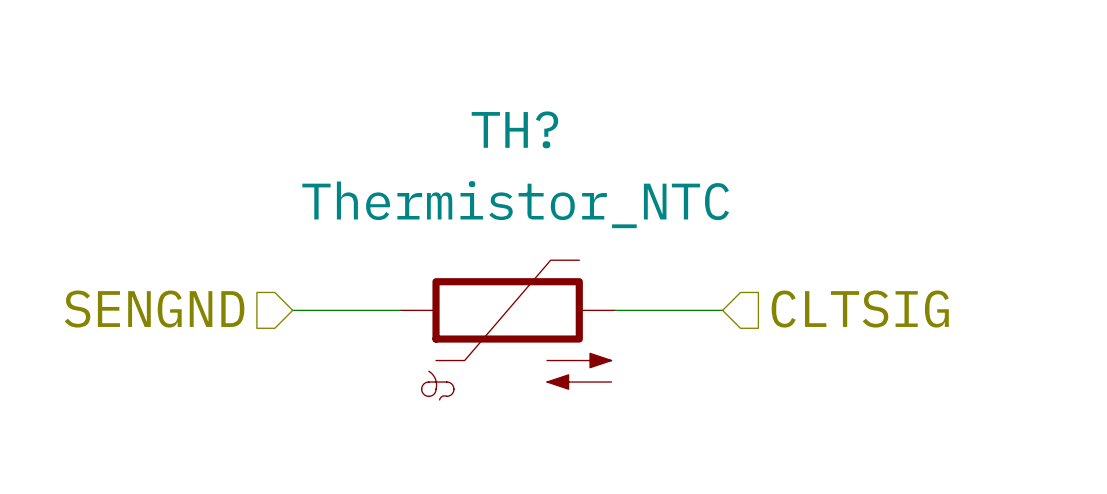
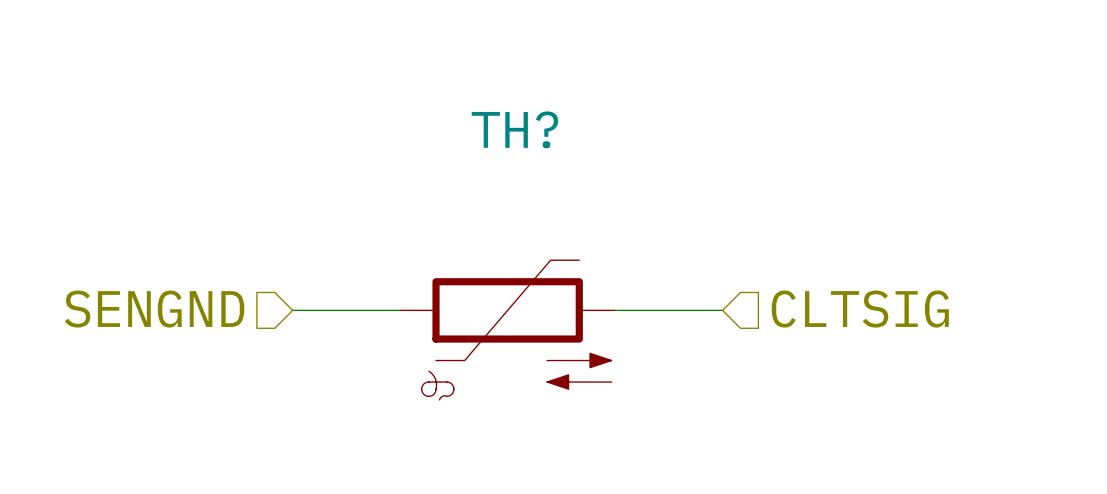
TH? value: Thermistor_NTC (515, 204) -> none

